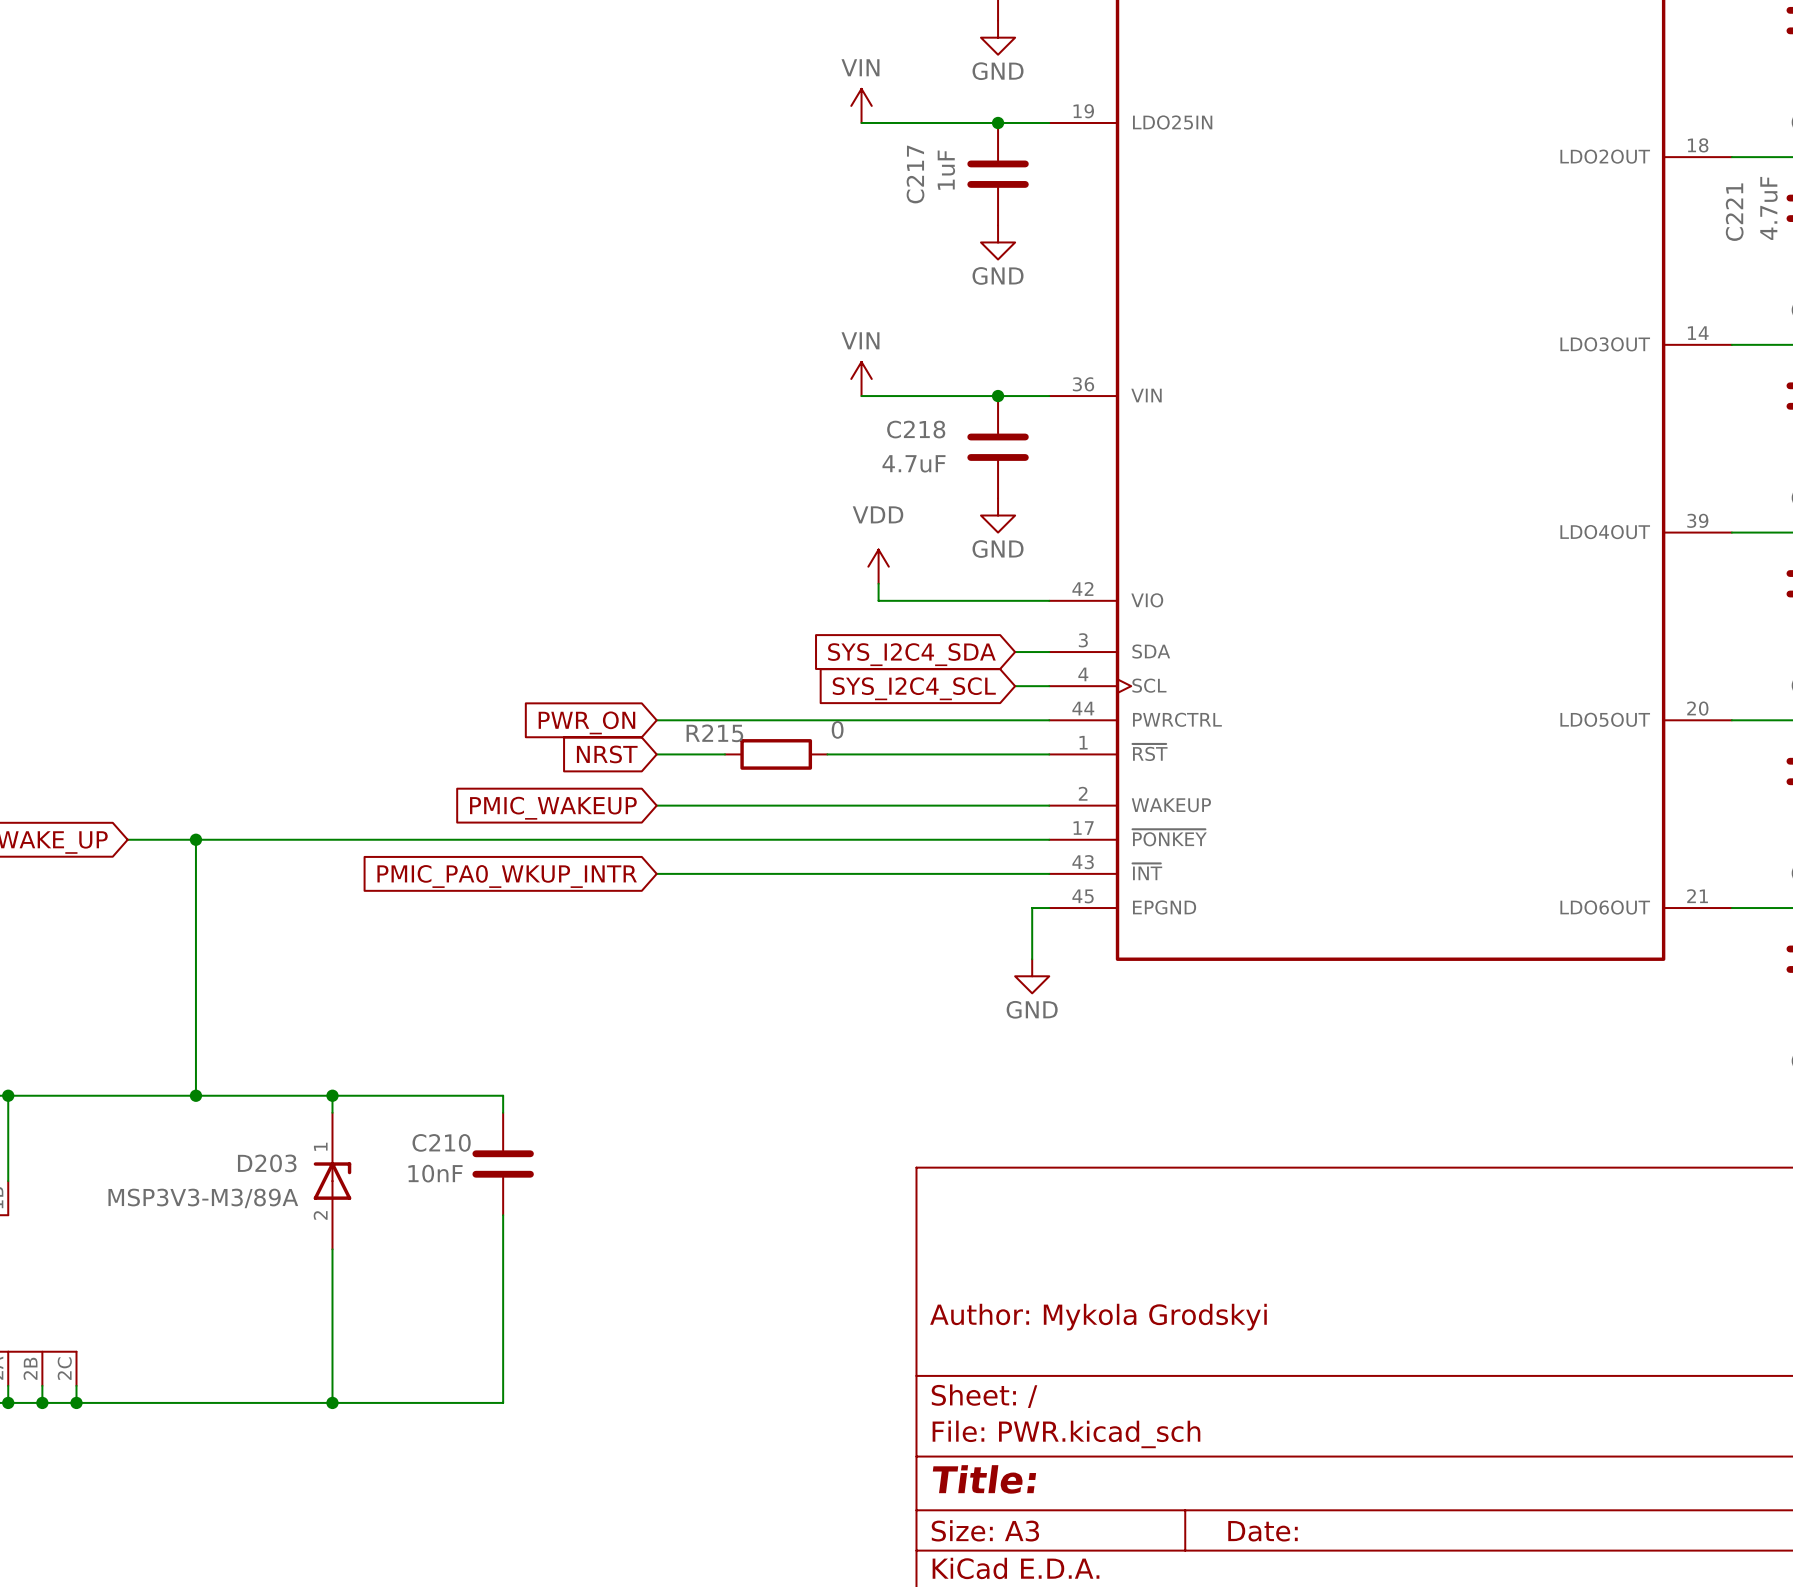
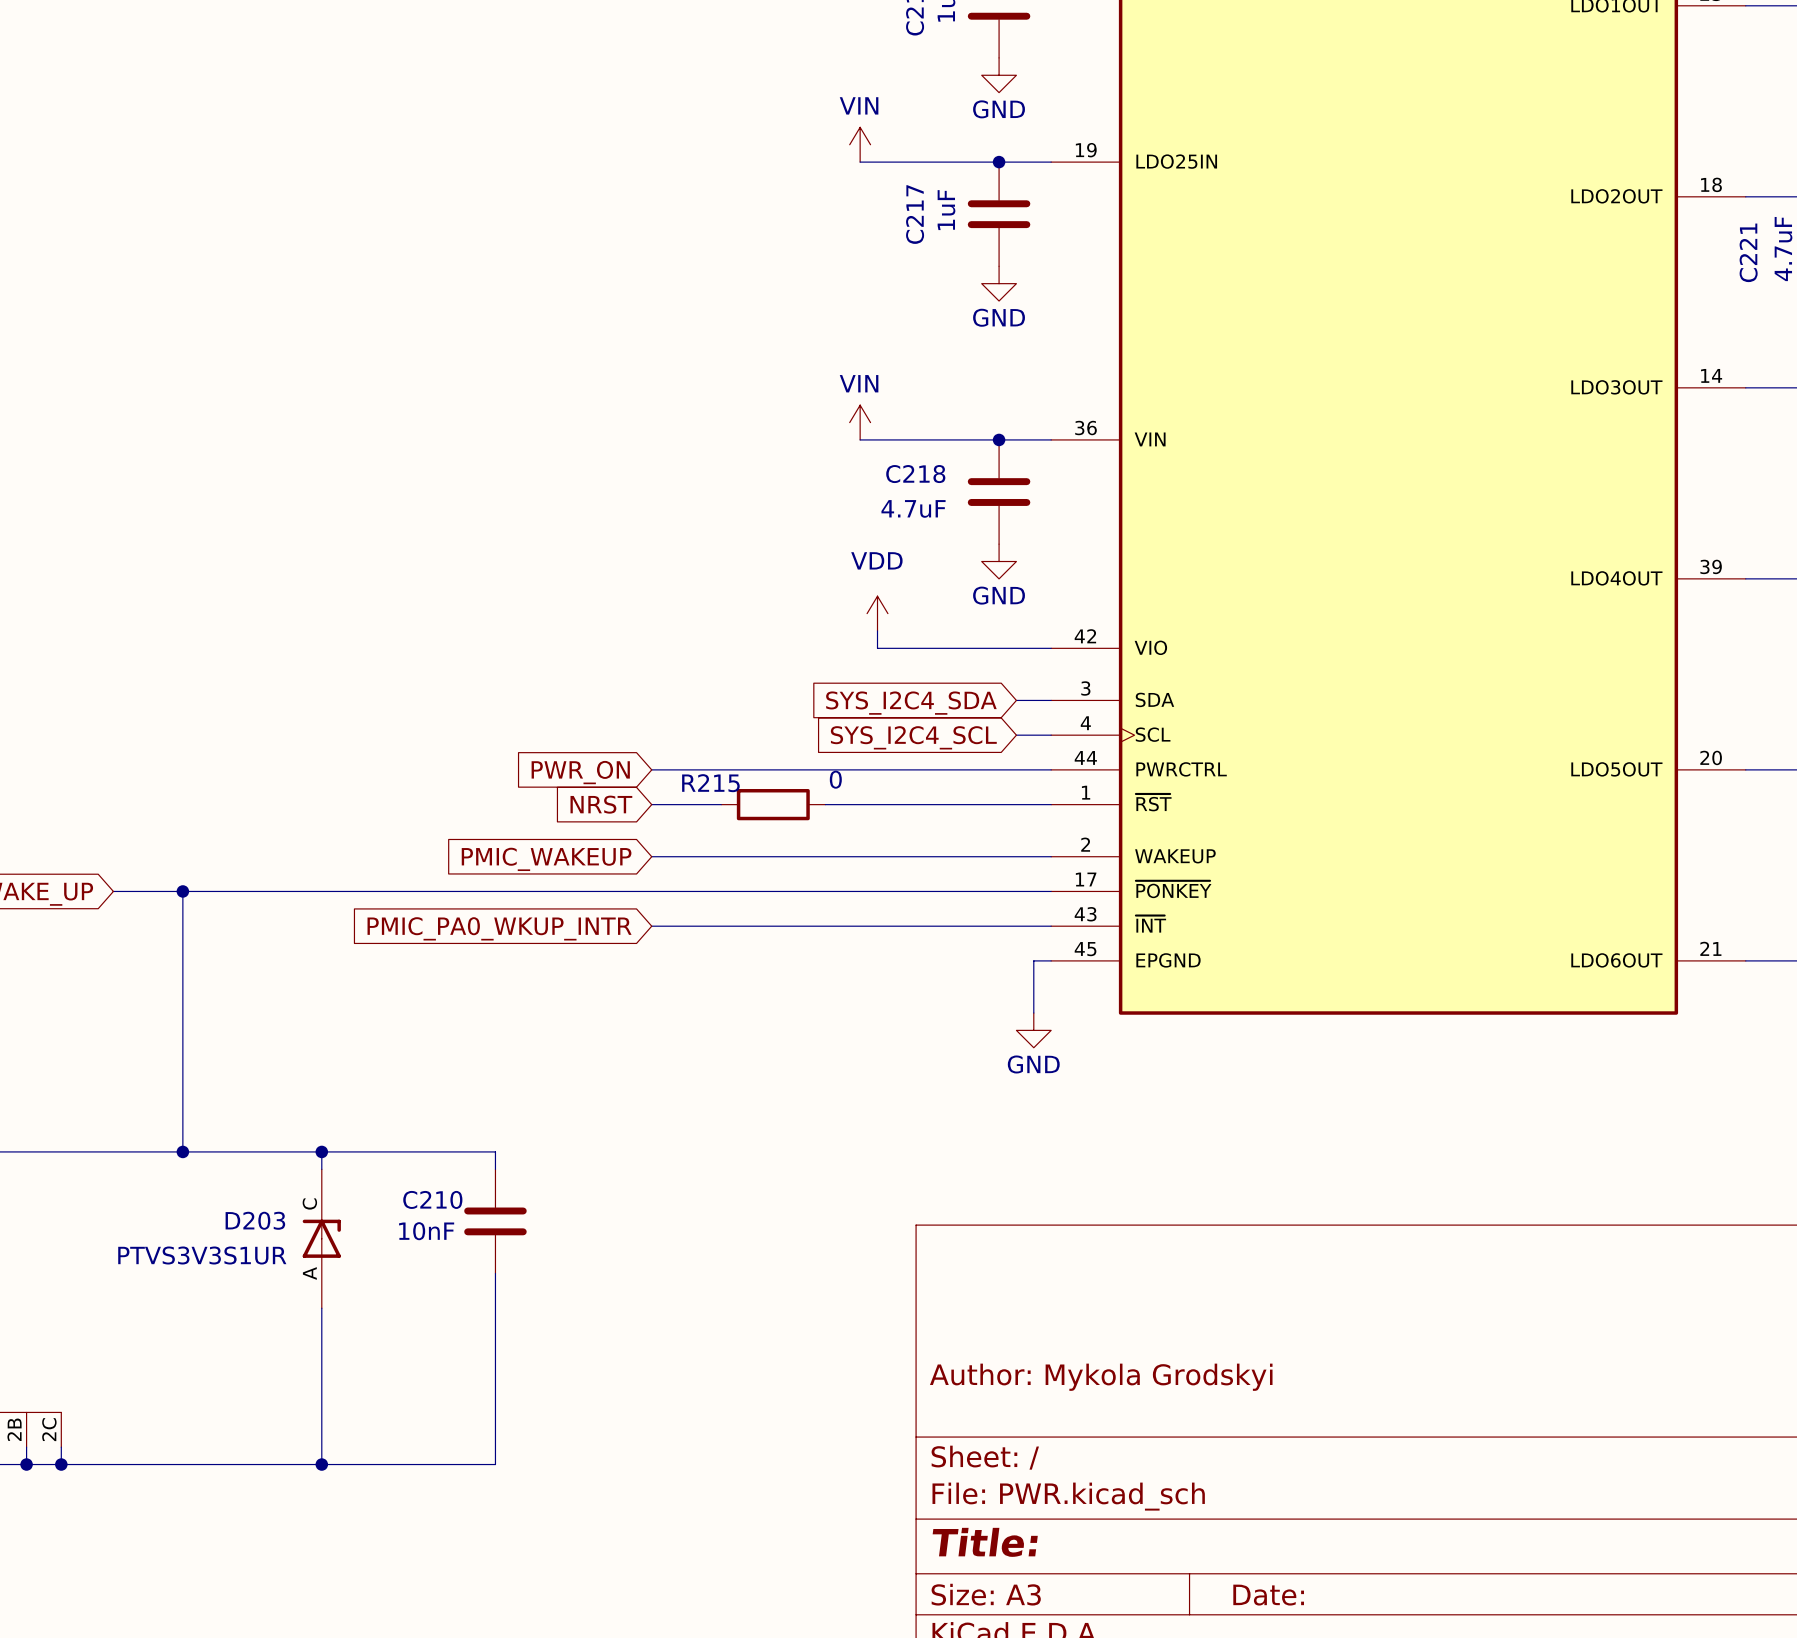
D203 pin number: 1 (320, 1146) -> C (309, 1204)
D203 value: MSP3V3-M3/89A (203, 1198) -> PTVS3V3S1UR (202, 1255)
D203 pin number: 2 (320, 1215) -> A (309, 1273)

